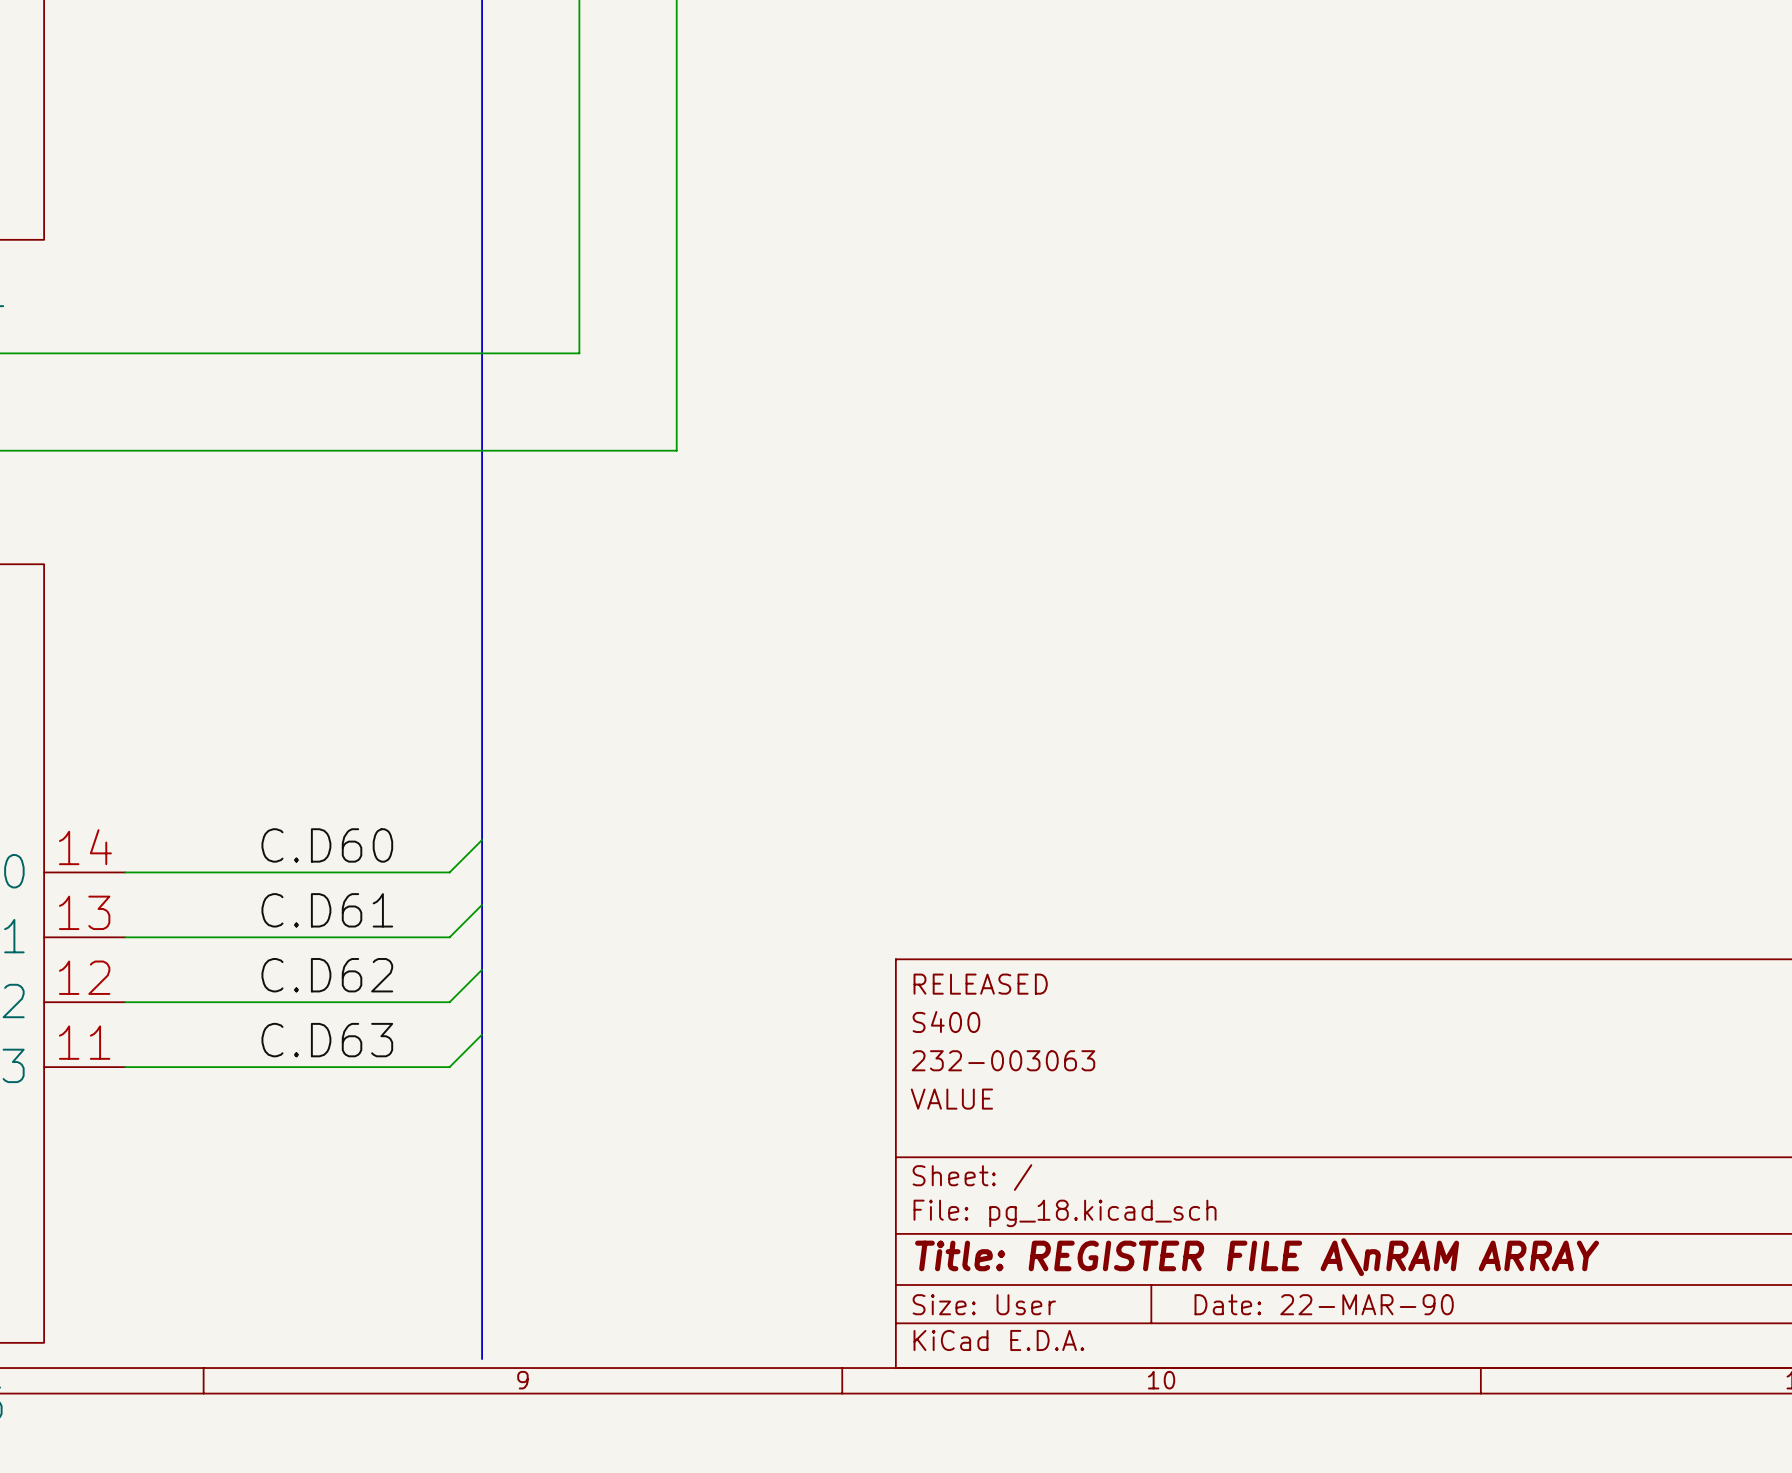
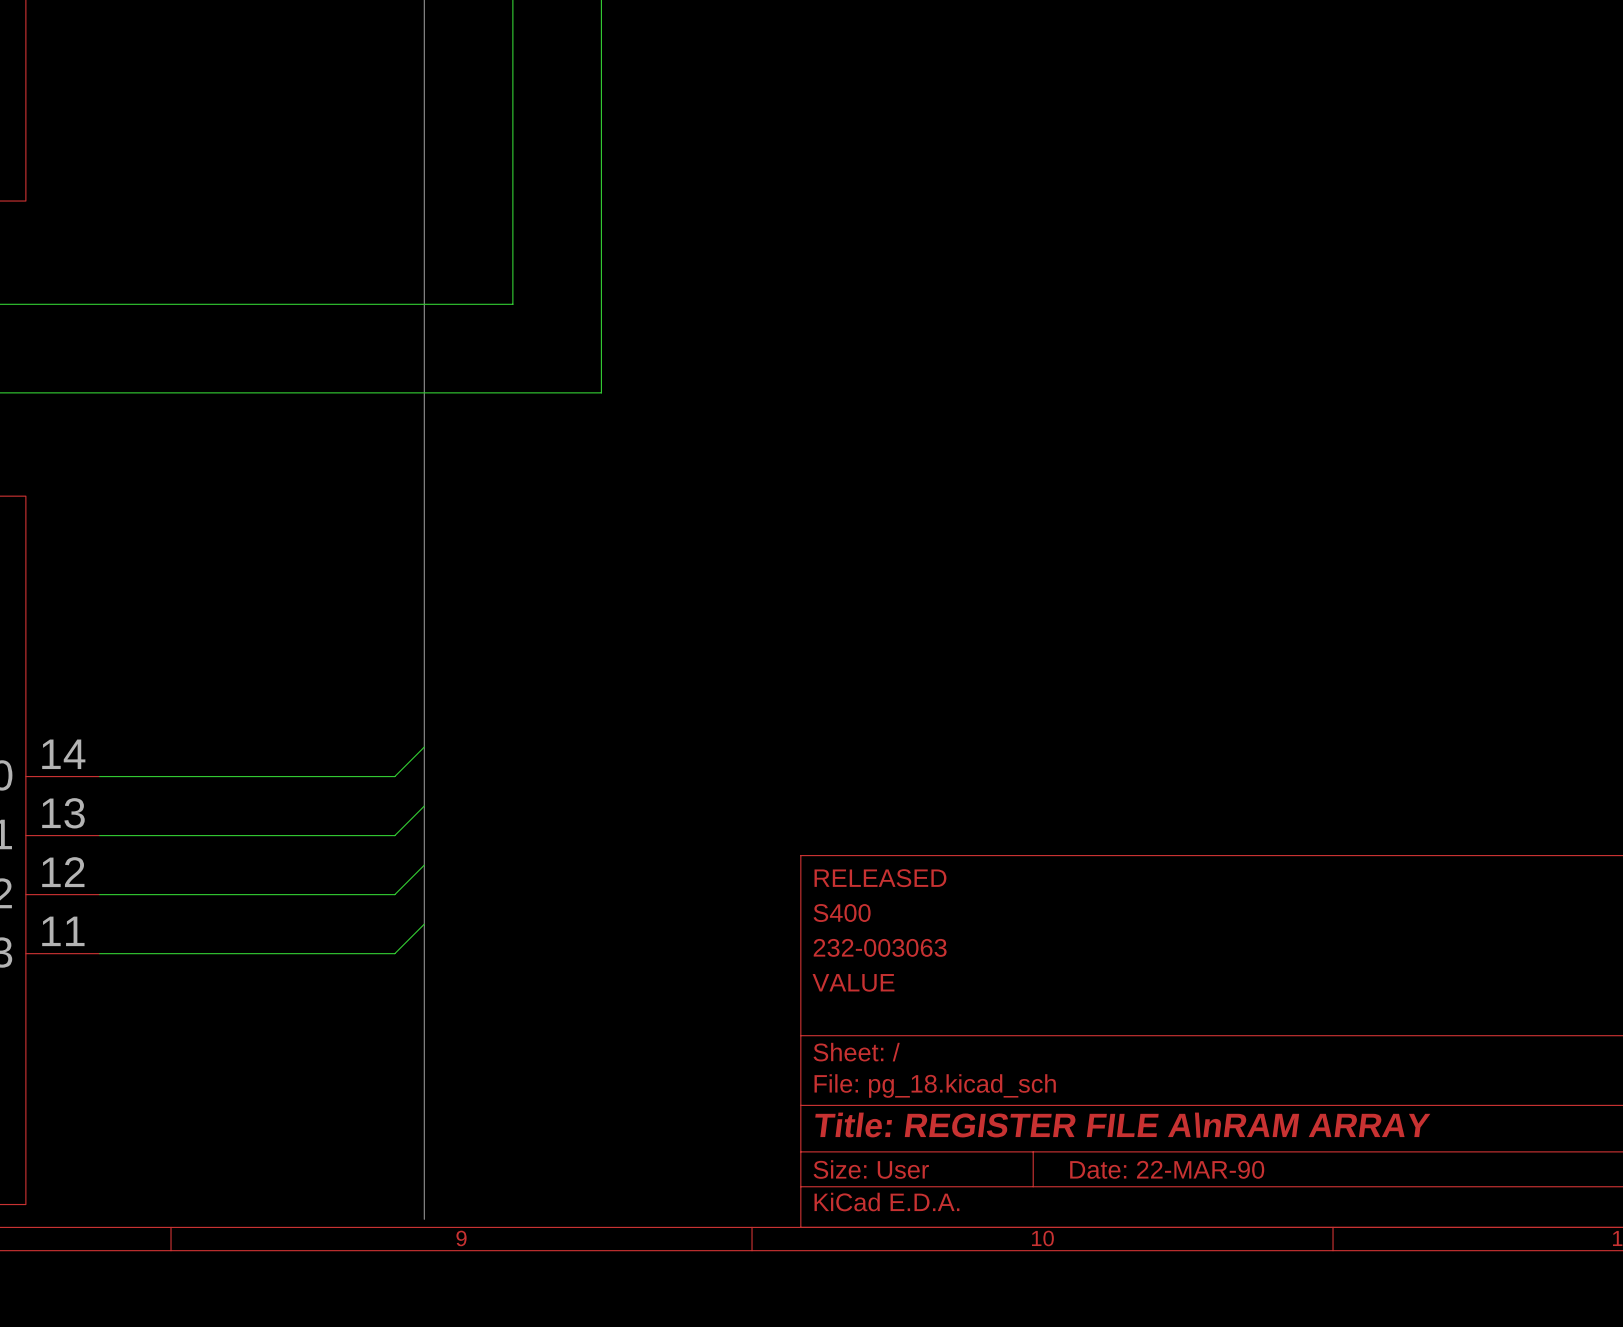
label: C.D60 (327, 845) -> none
label: C.D61 (327, 910) -> none
label: C.D62 (327, 975) -> none
label: C.D63 (327, 1040) -> none

